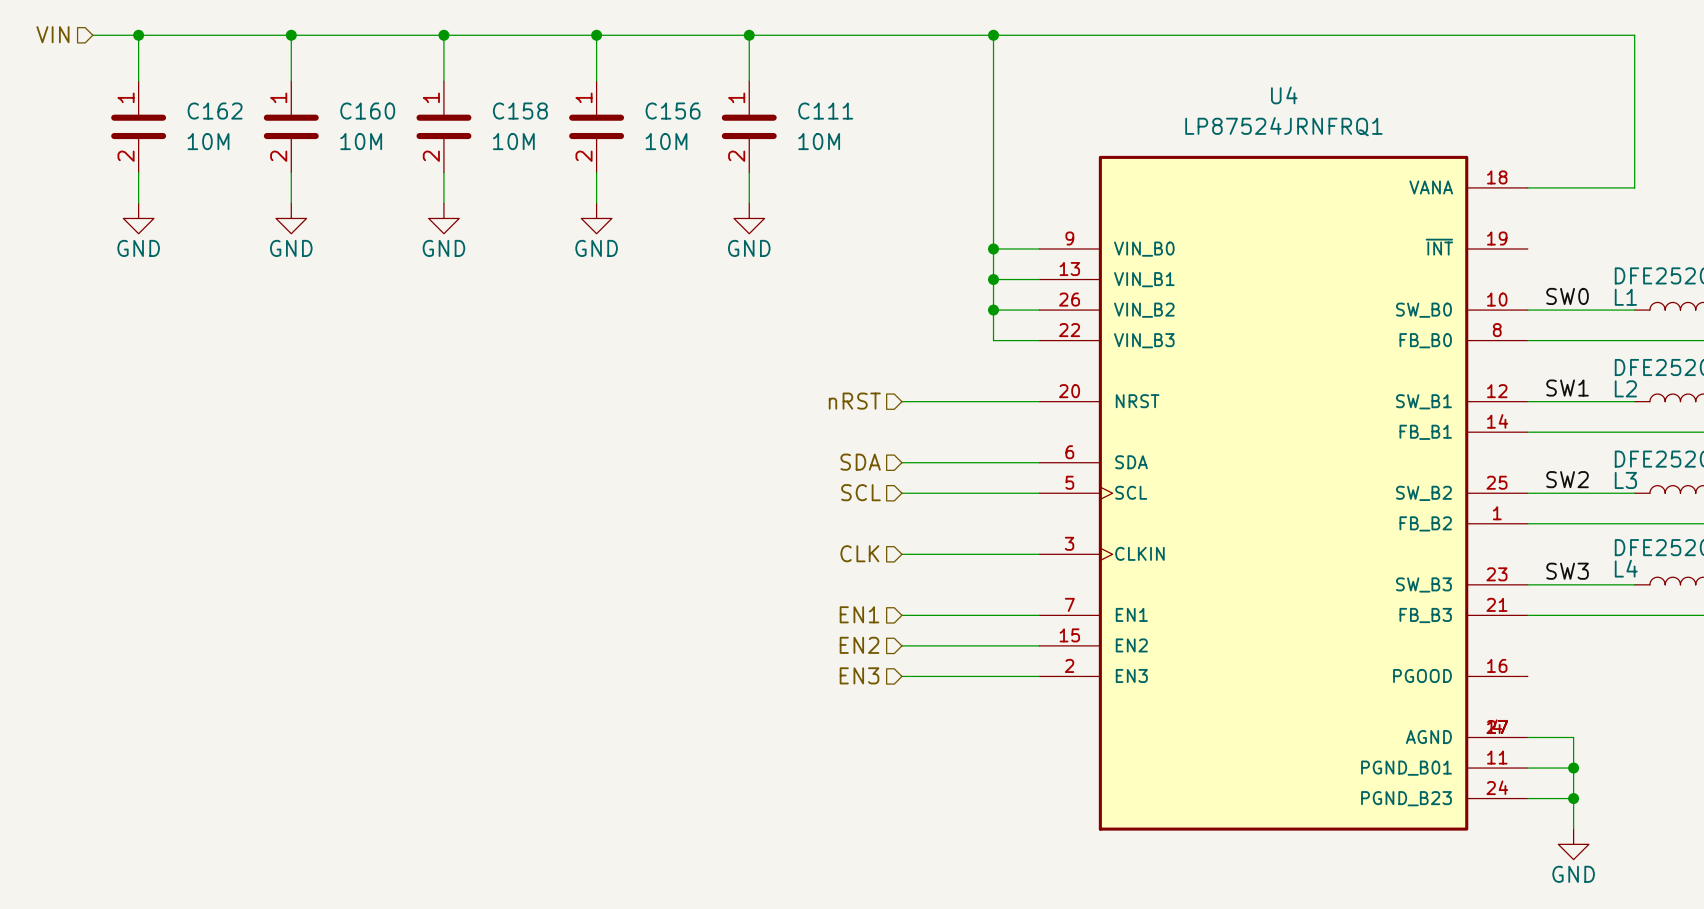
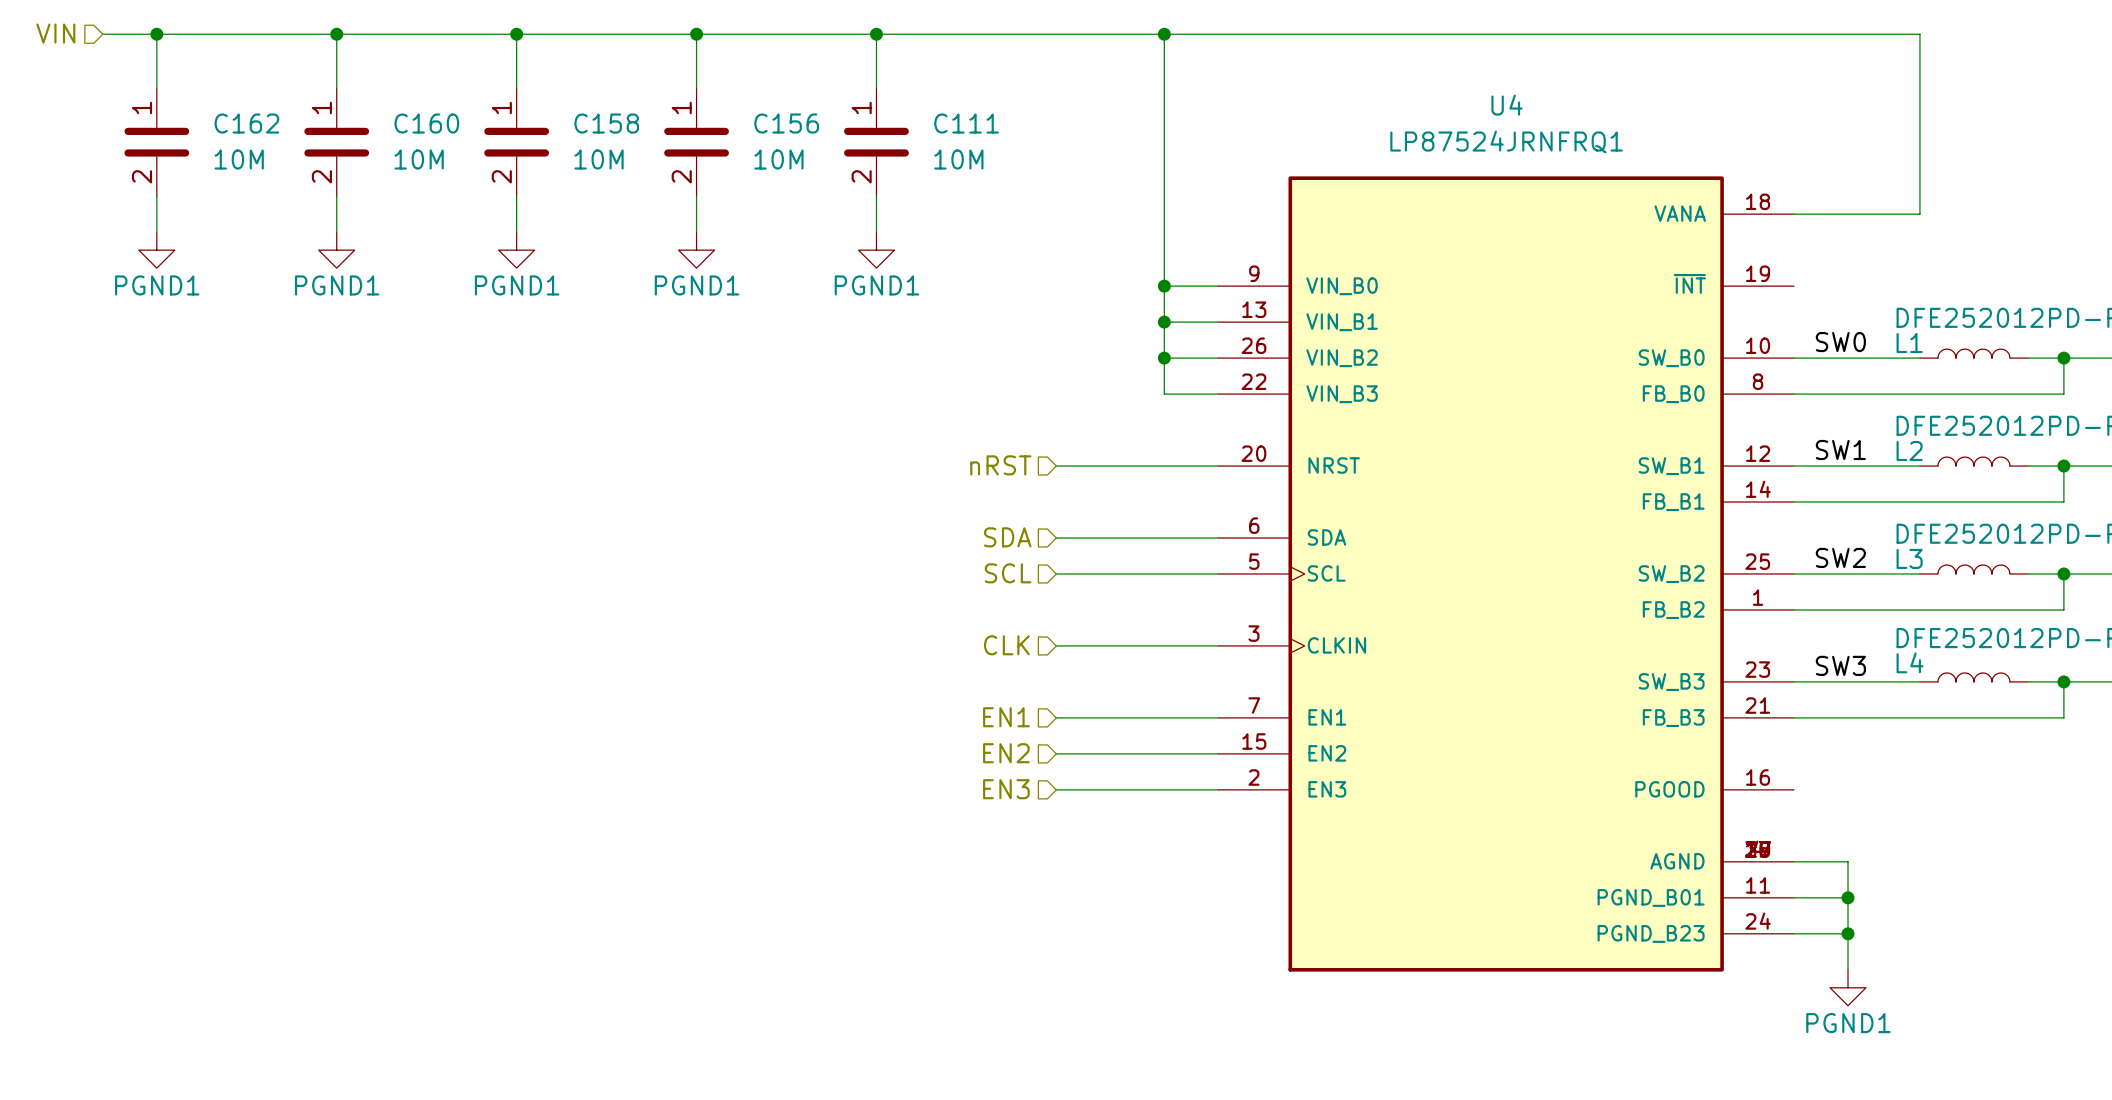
U4 symbol: [1039, 155, 1528, 831] -> [1218, 176, 1795, 972]
power symbol: GND (138, 218) -> PGND1 (156, 250)
power symbol: GND (291, 218) -> PGND1 (336, 250)
power symbol: GND (443, 218) -> PGND1 (516, 250)
power symbol: GND (596, 218) -> PGND1 (696, 250)
power symbol: GND (749, 218) -> PGND1 (876, 250)
power symbol: GND (1573, 844) -> PGND1 (1848, 987)

